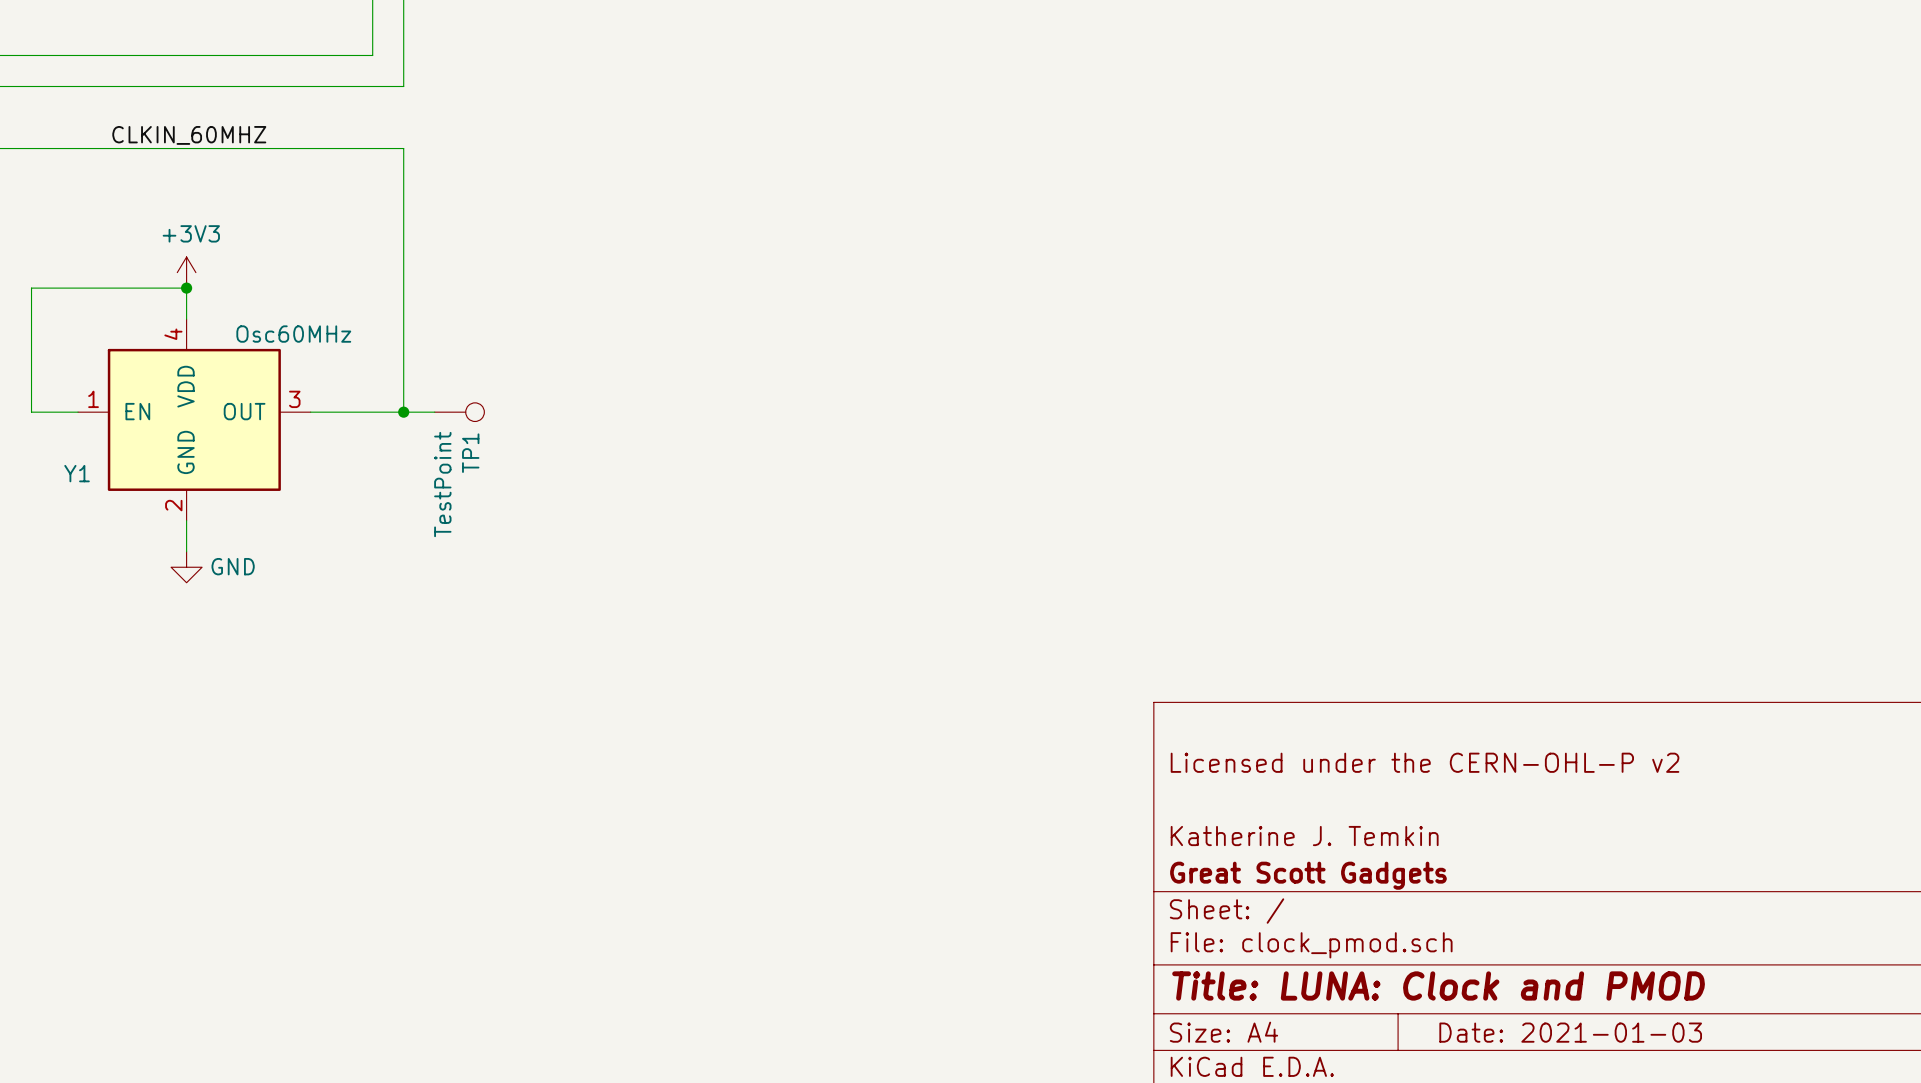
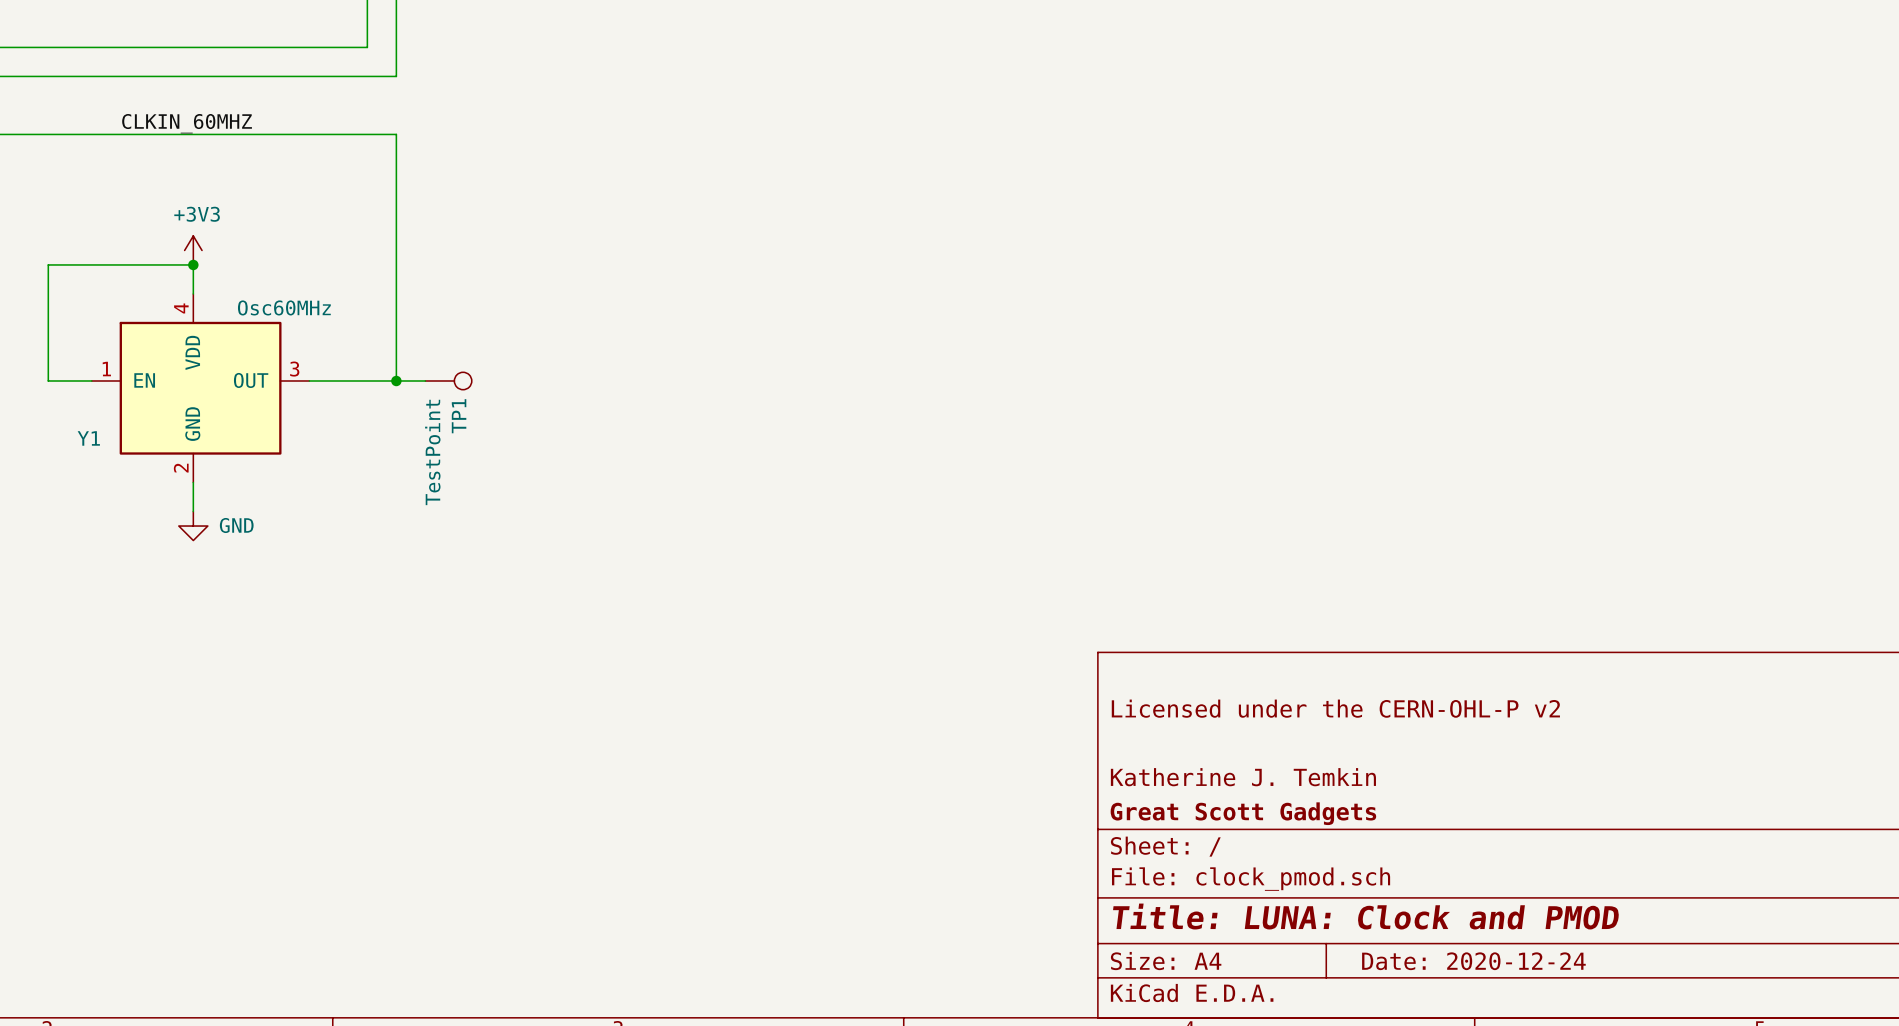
title block: Date: 2021-01-03 (1570, 1032) -> Date: 2020-12-24 (1473, 961)

